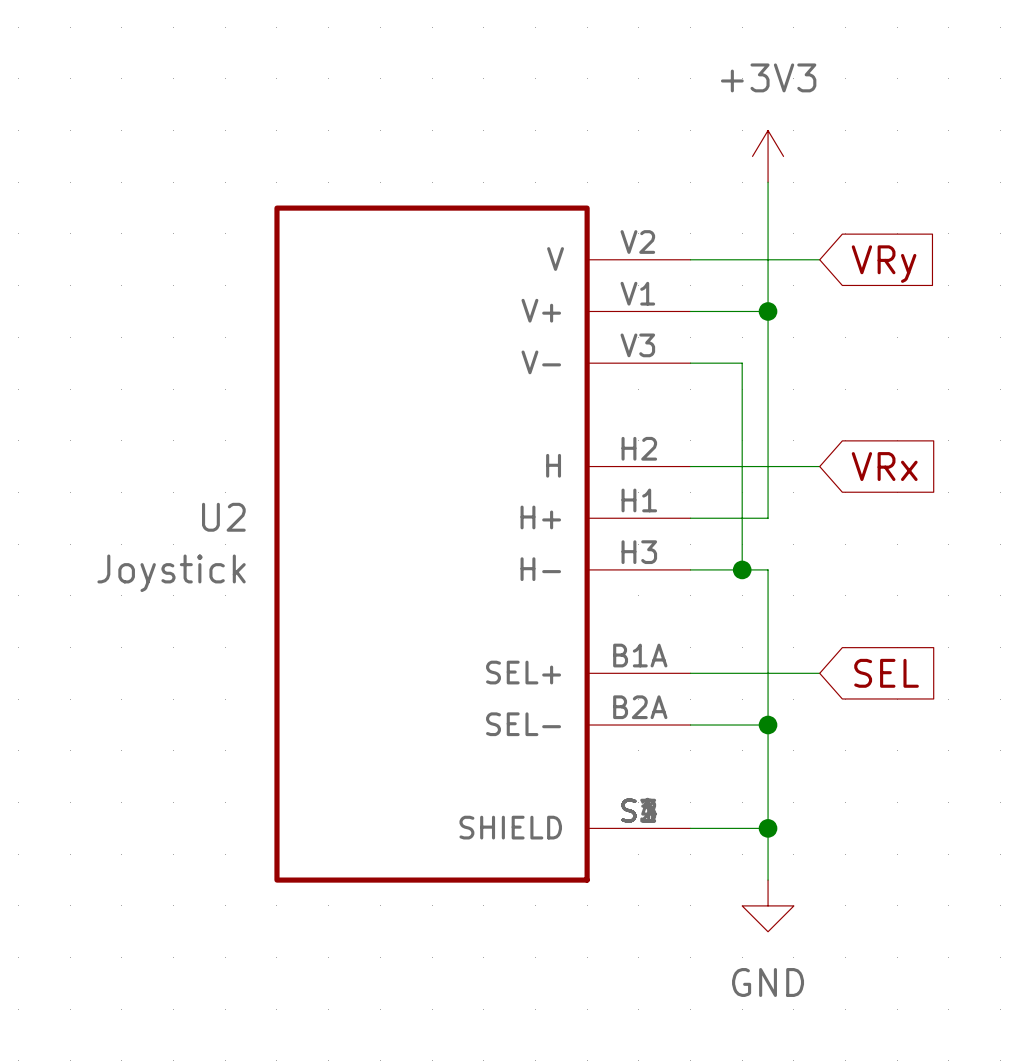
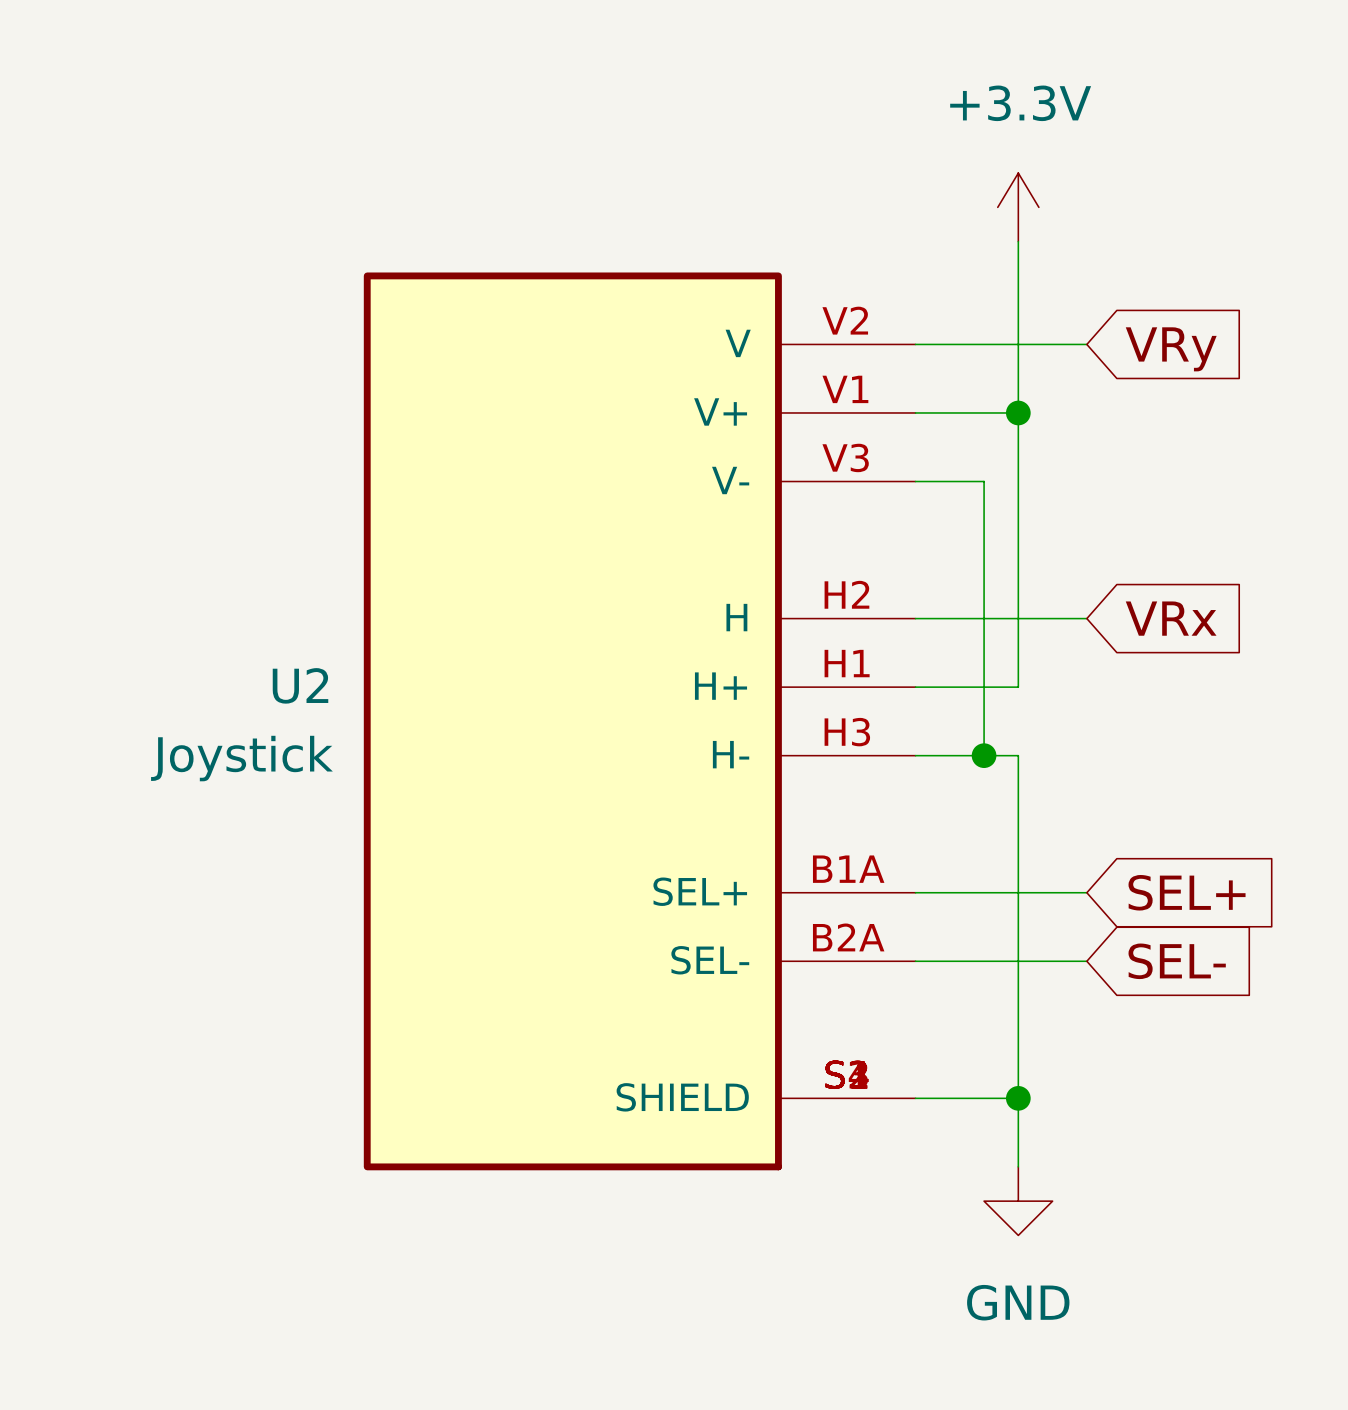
power symbol: +3V3 (768, 156) -> +3.3V (1018, 207)
global label: SEL (886, 673) -> SEL+ (1187, 892)
wire: none -> (1018, 961) (1086, 961)
junction: (768, 725) -> none
global label: none -> SEL- (1177, 961)

